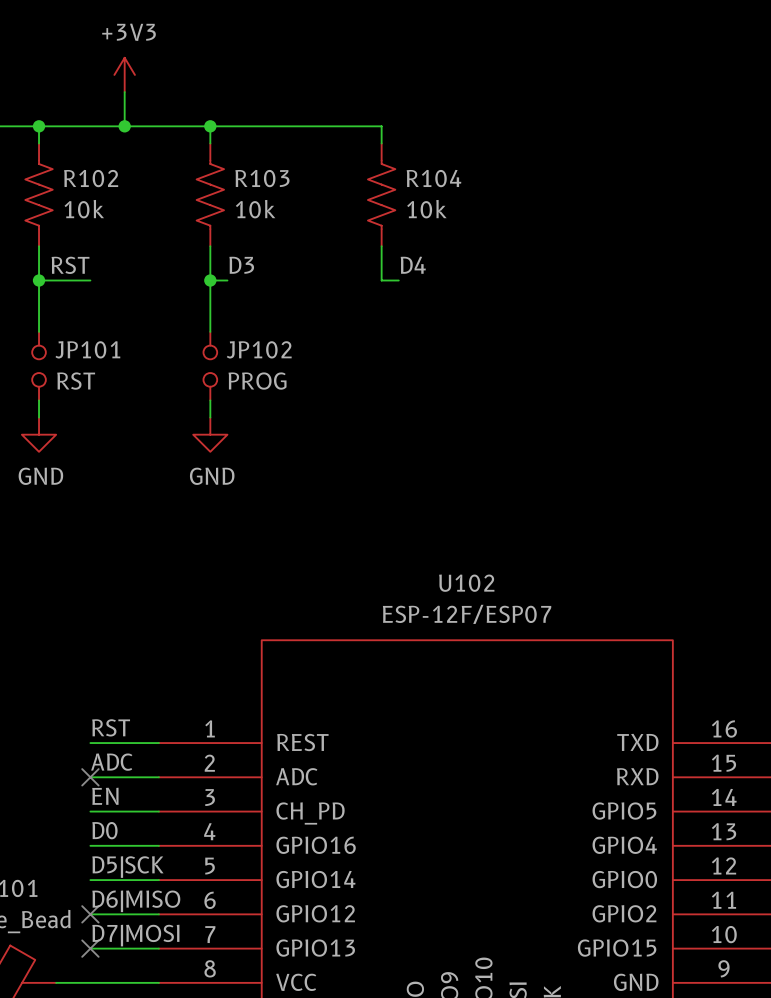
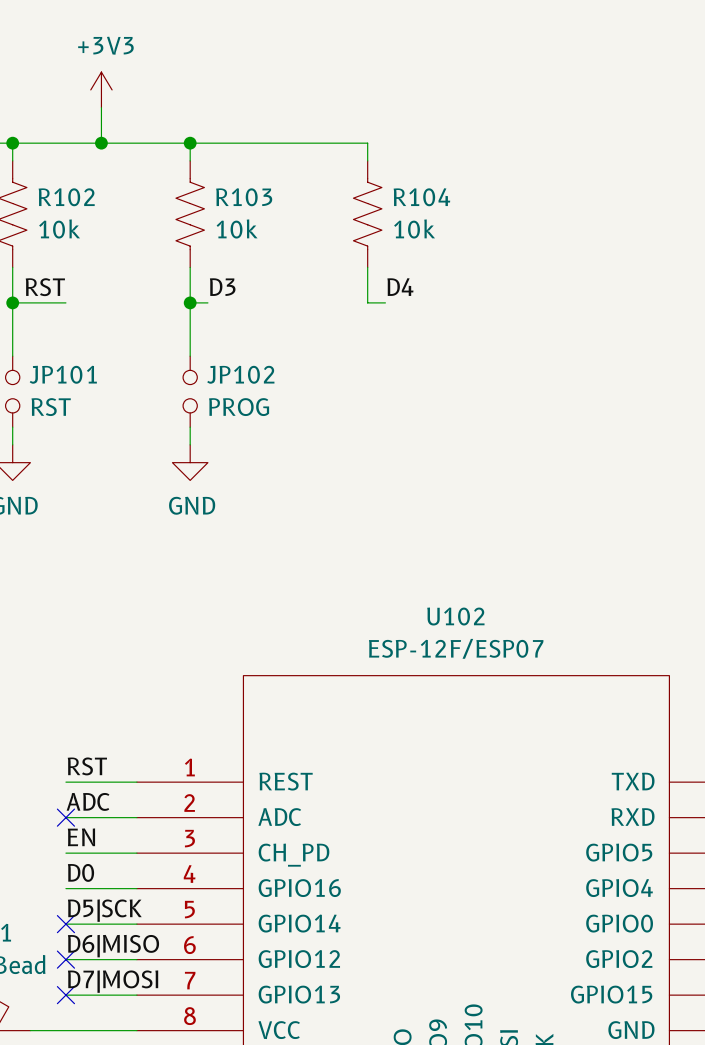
no-connect mark: none -> (65, 924)

